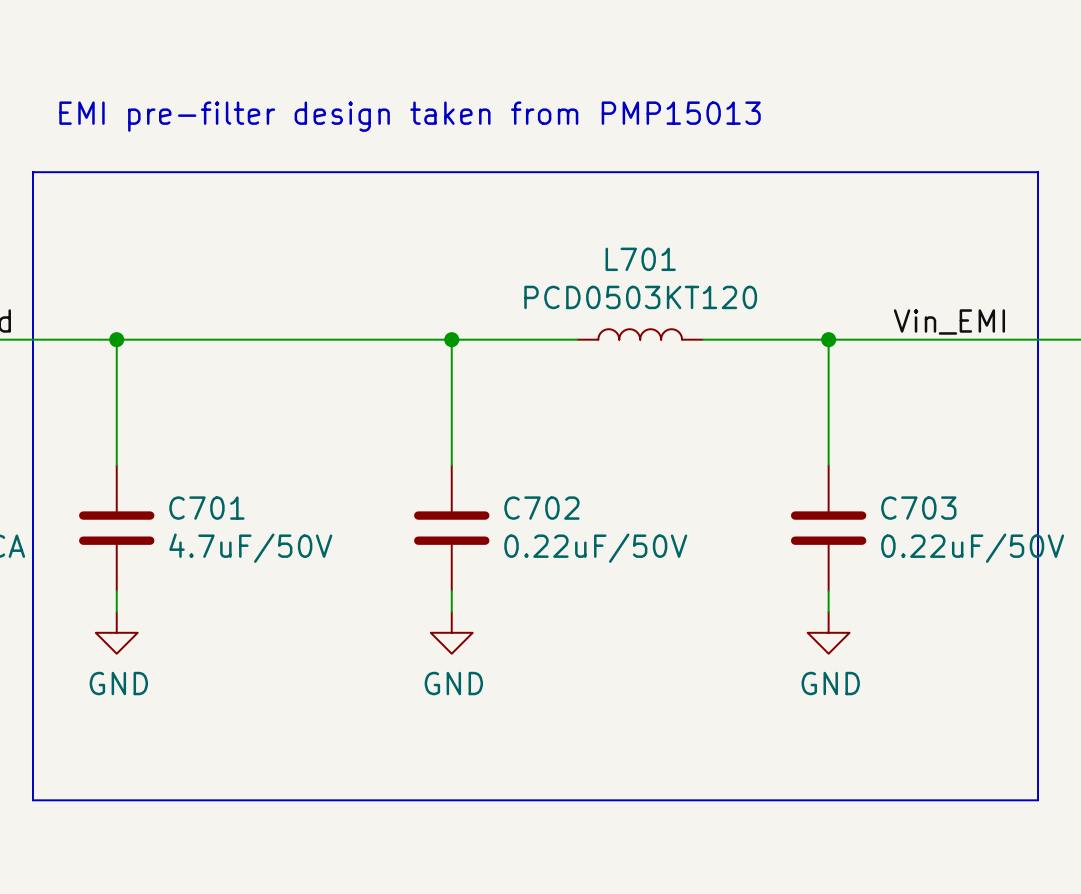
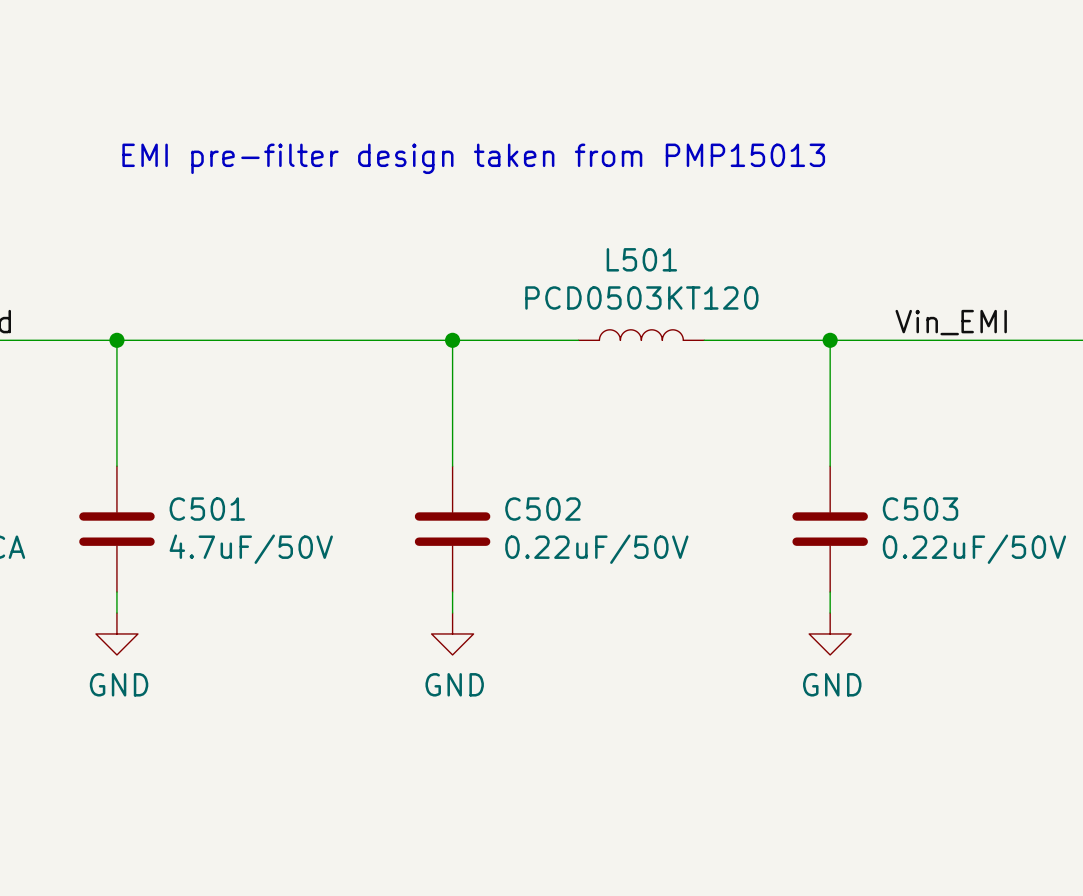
text position: EMI pre-filter design taken from PMP15013 (410, 116) -> EMI pre-filter design taken from PMP15013 (473, 158)
line: (32, 172) (1038, 172) (1038, 800) (32, 800) (32, 172) -> none
L701 name: L701 (640, 259) -> L501 (641, 259)
C701 name: C701 (206, 508) -> C501 (207, 509)
C702 name: C702 (541, 508) -> C502 (542, 509)
C703 name: C703 (918, 508) -> C503 (920, 509)

